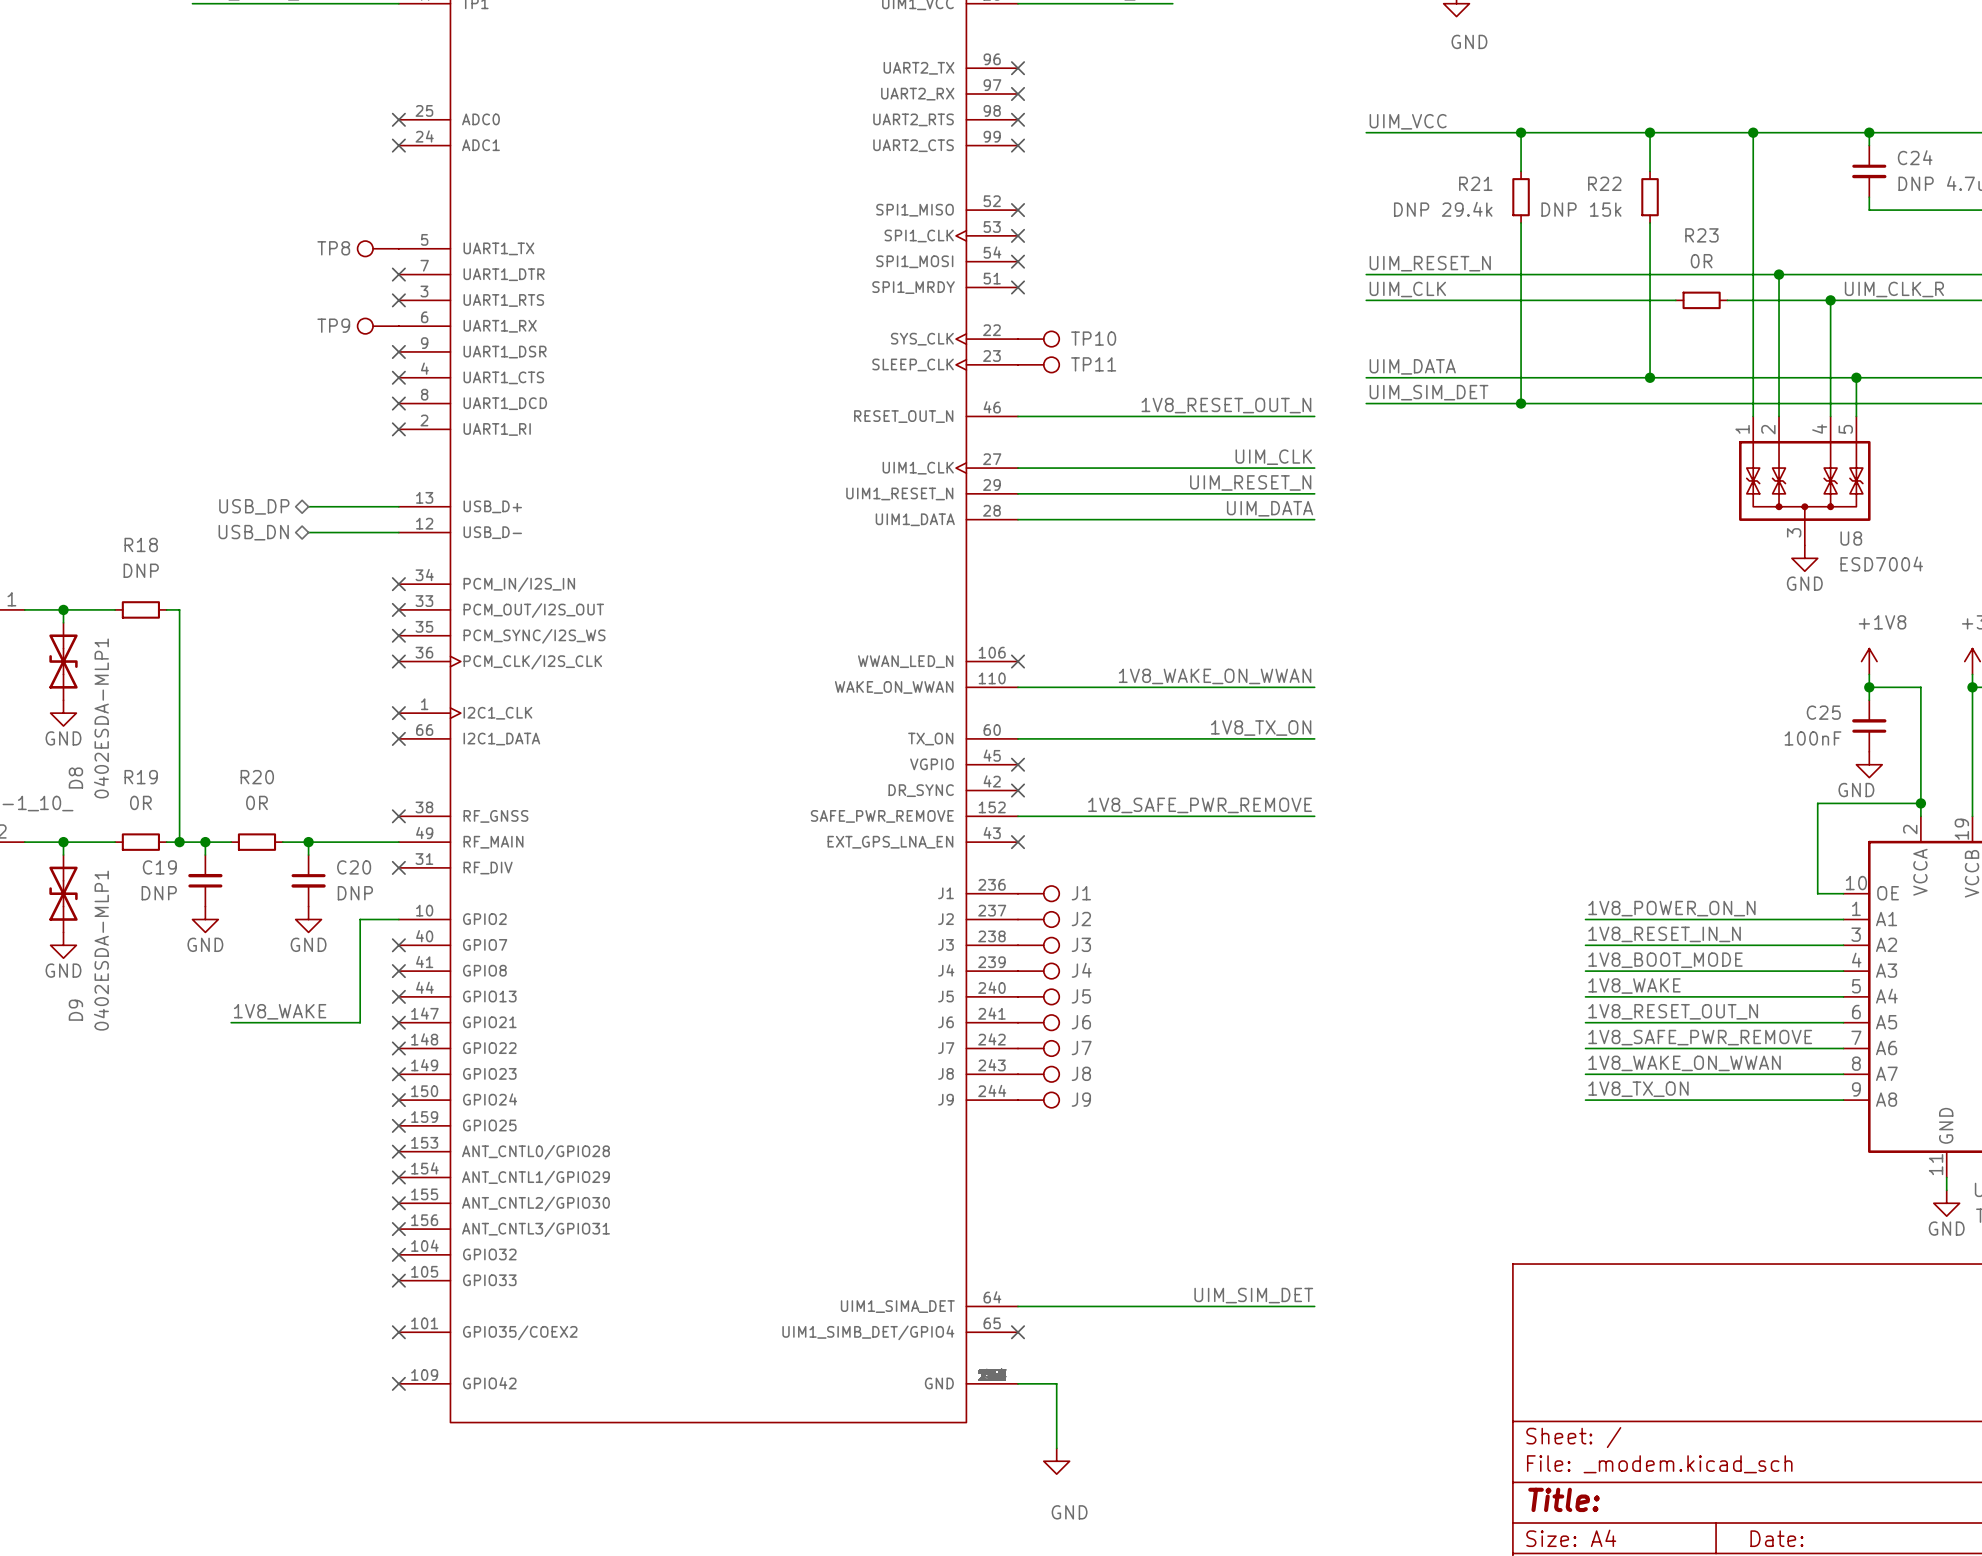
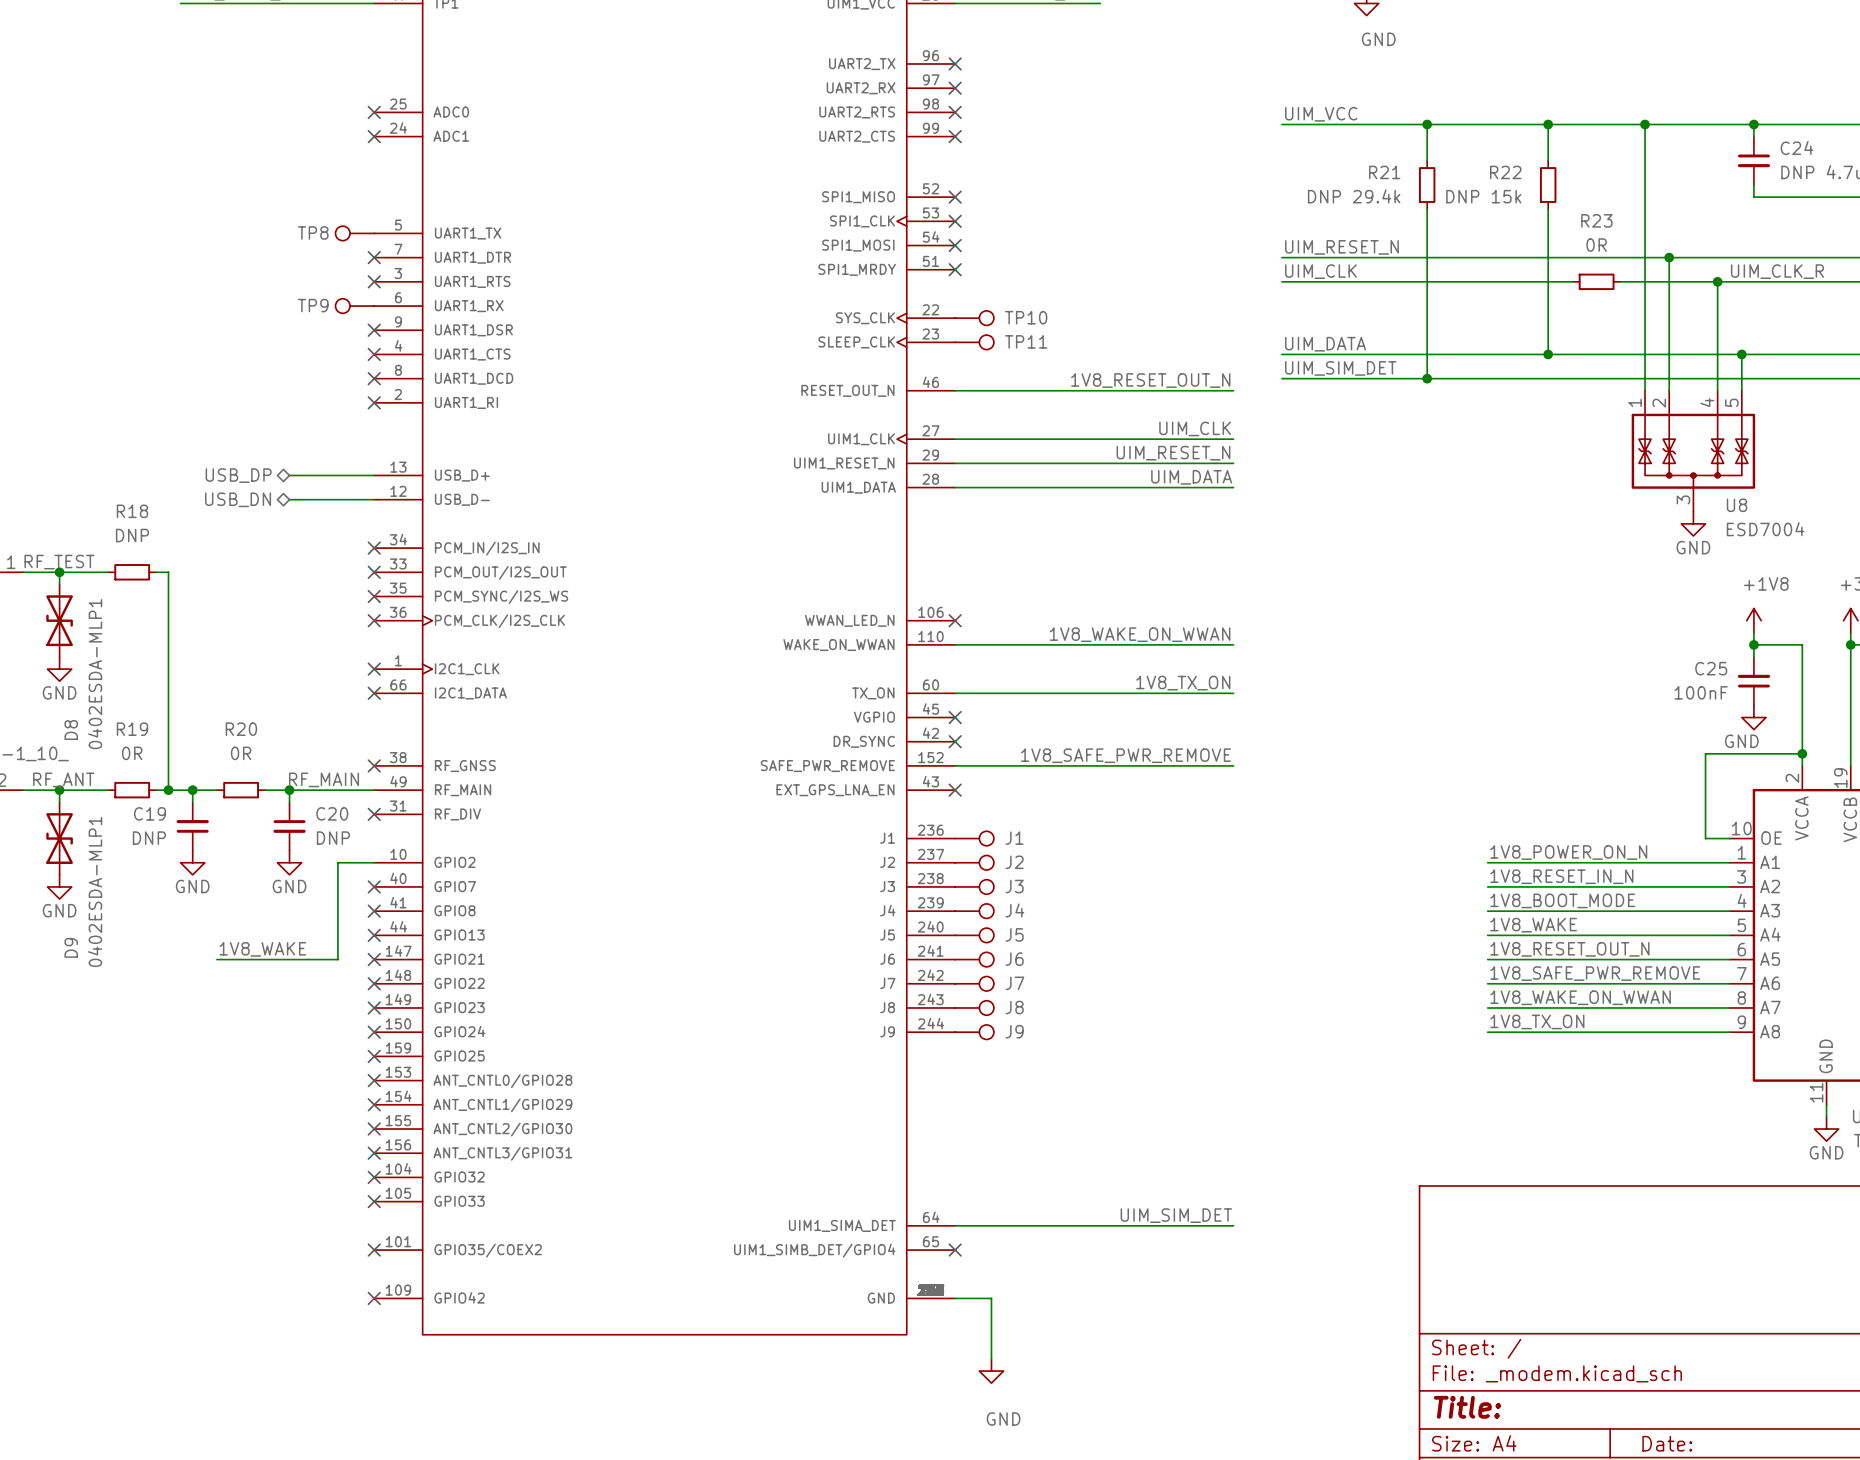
label: none -> RF_TEST (59, 562)
label: none -> RF_ANT (63, 779)
label: none -> RF_MAIN (324, 779)

